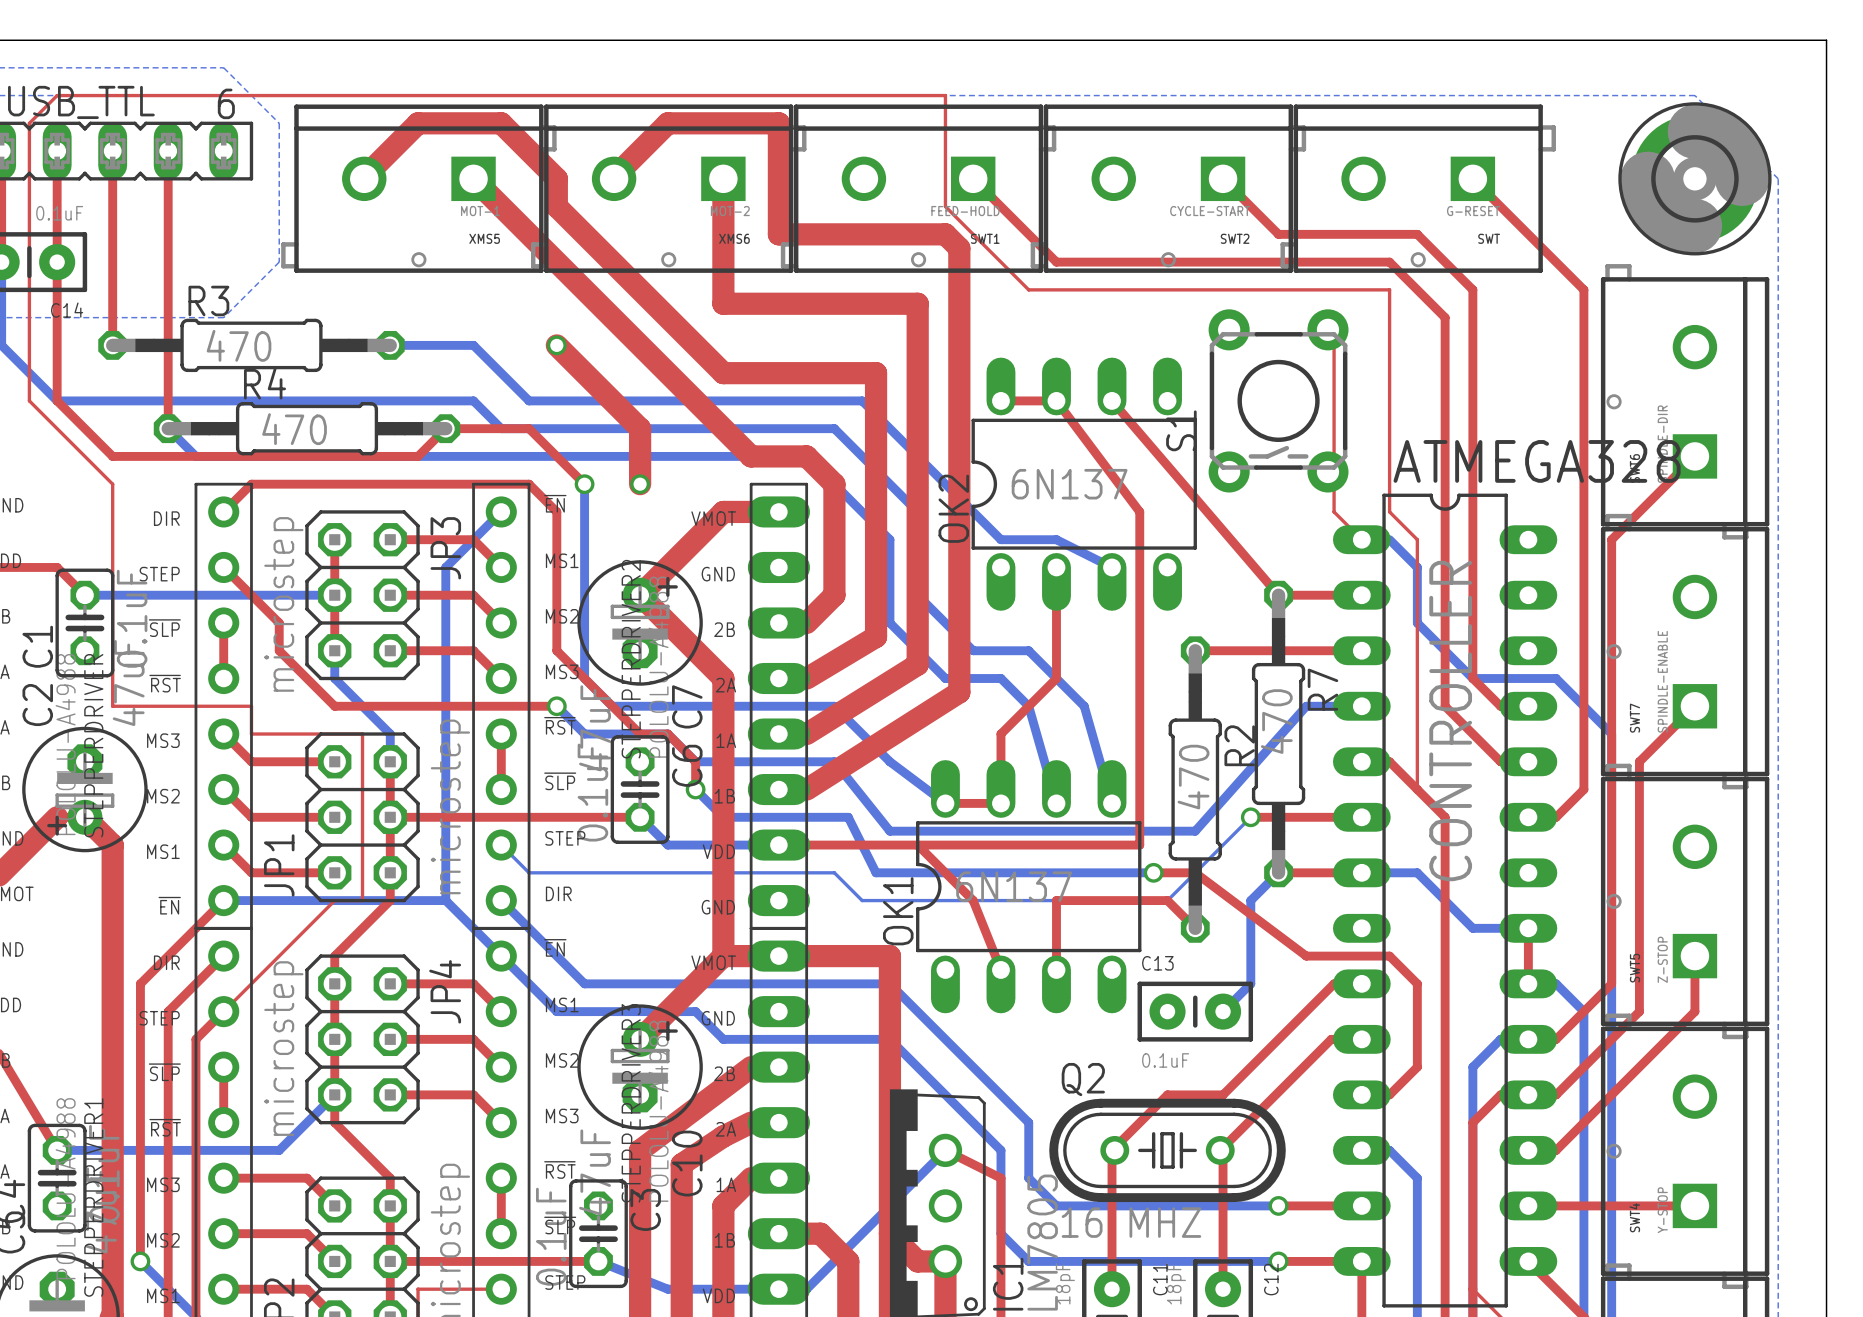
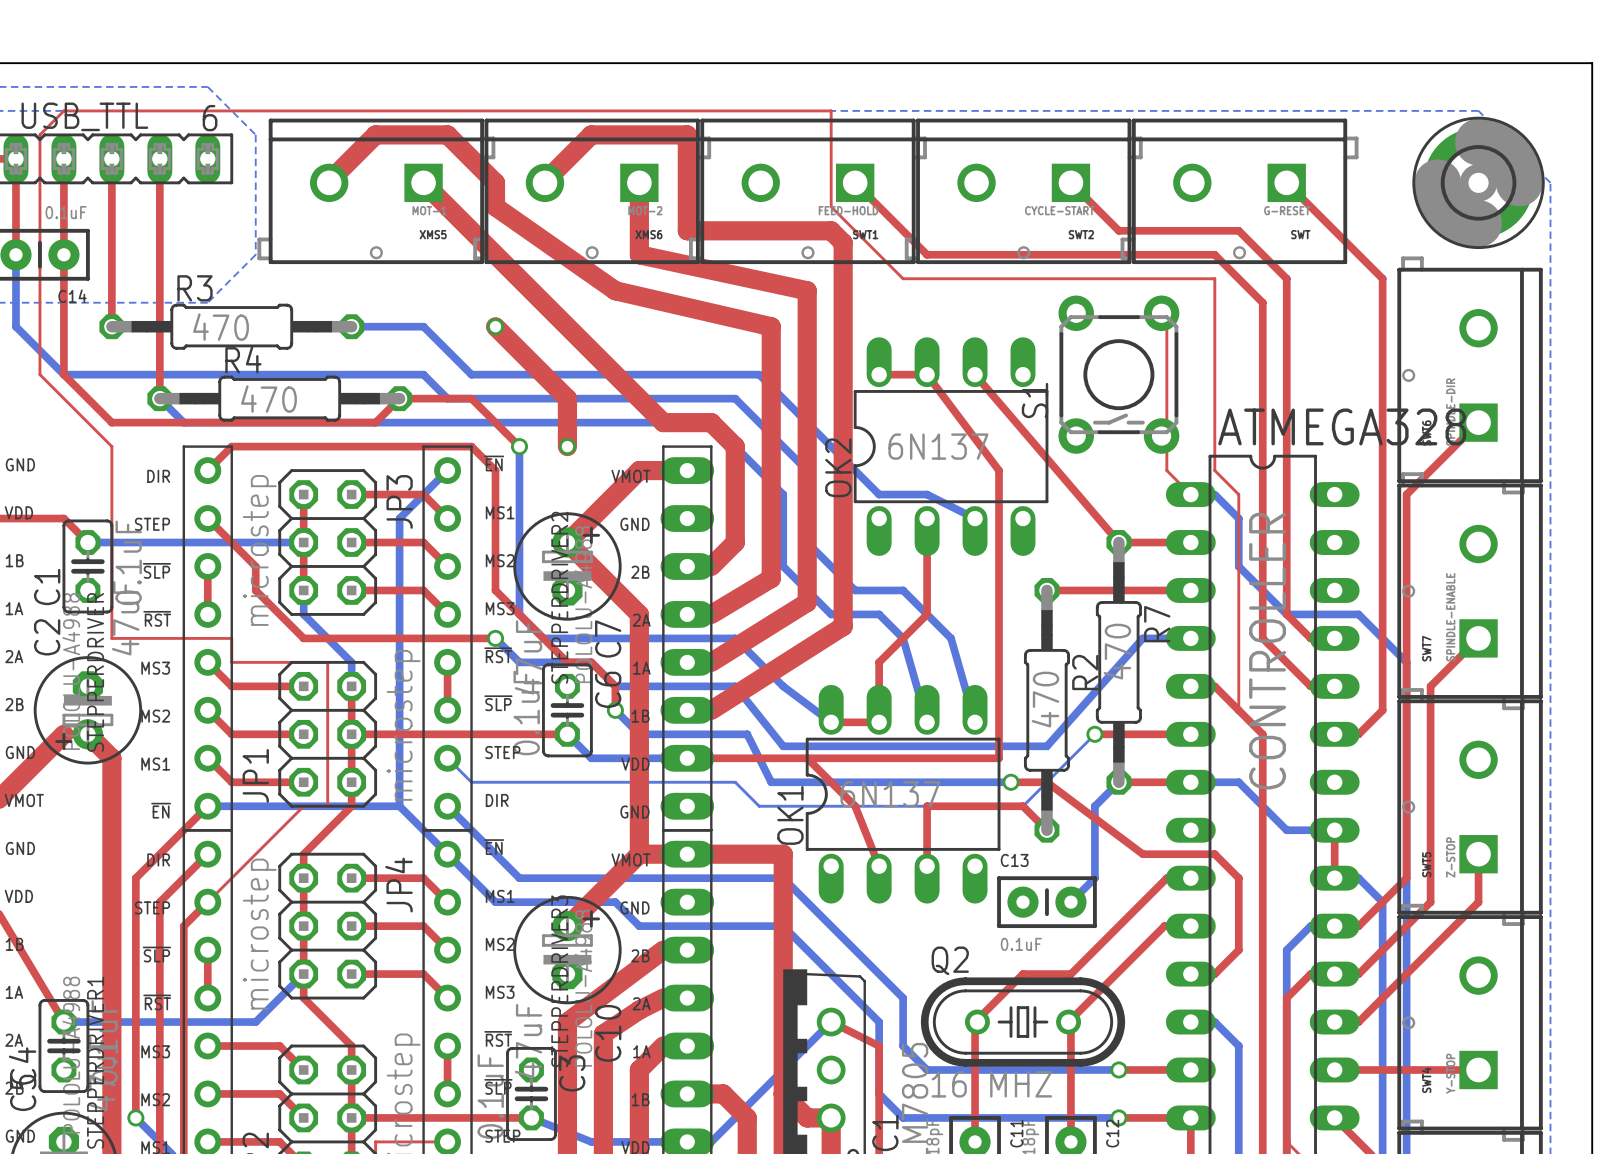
top track: (556, 206) (723, 373) (876, 373) -> (495, 206) (615, 290) (771, 326) (771, 350)
top track: (723, 262) (723, 303) (917, 303) -> (639, 254) (807, 290)

